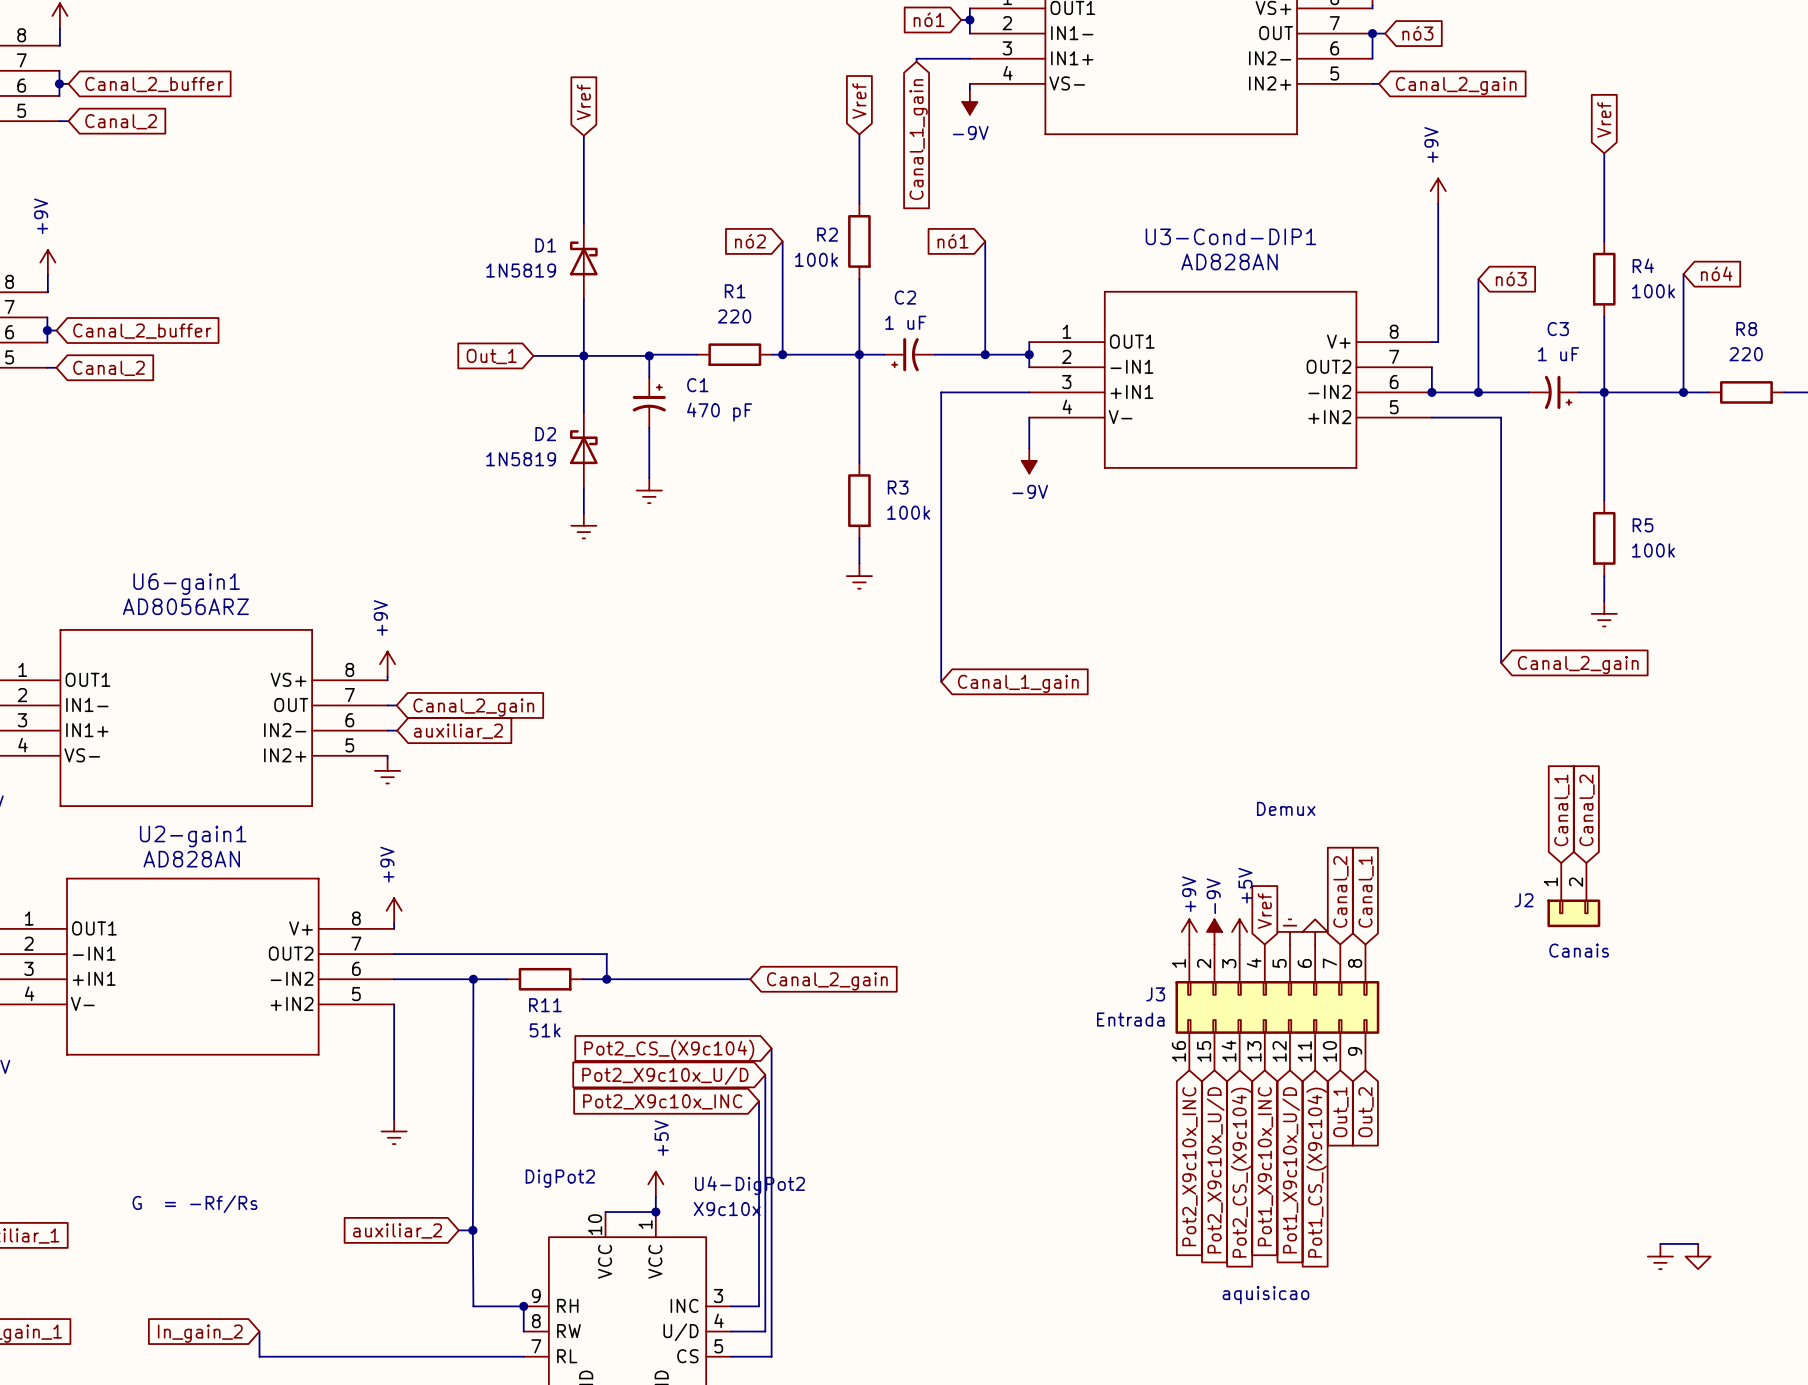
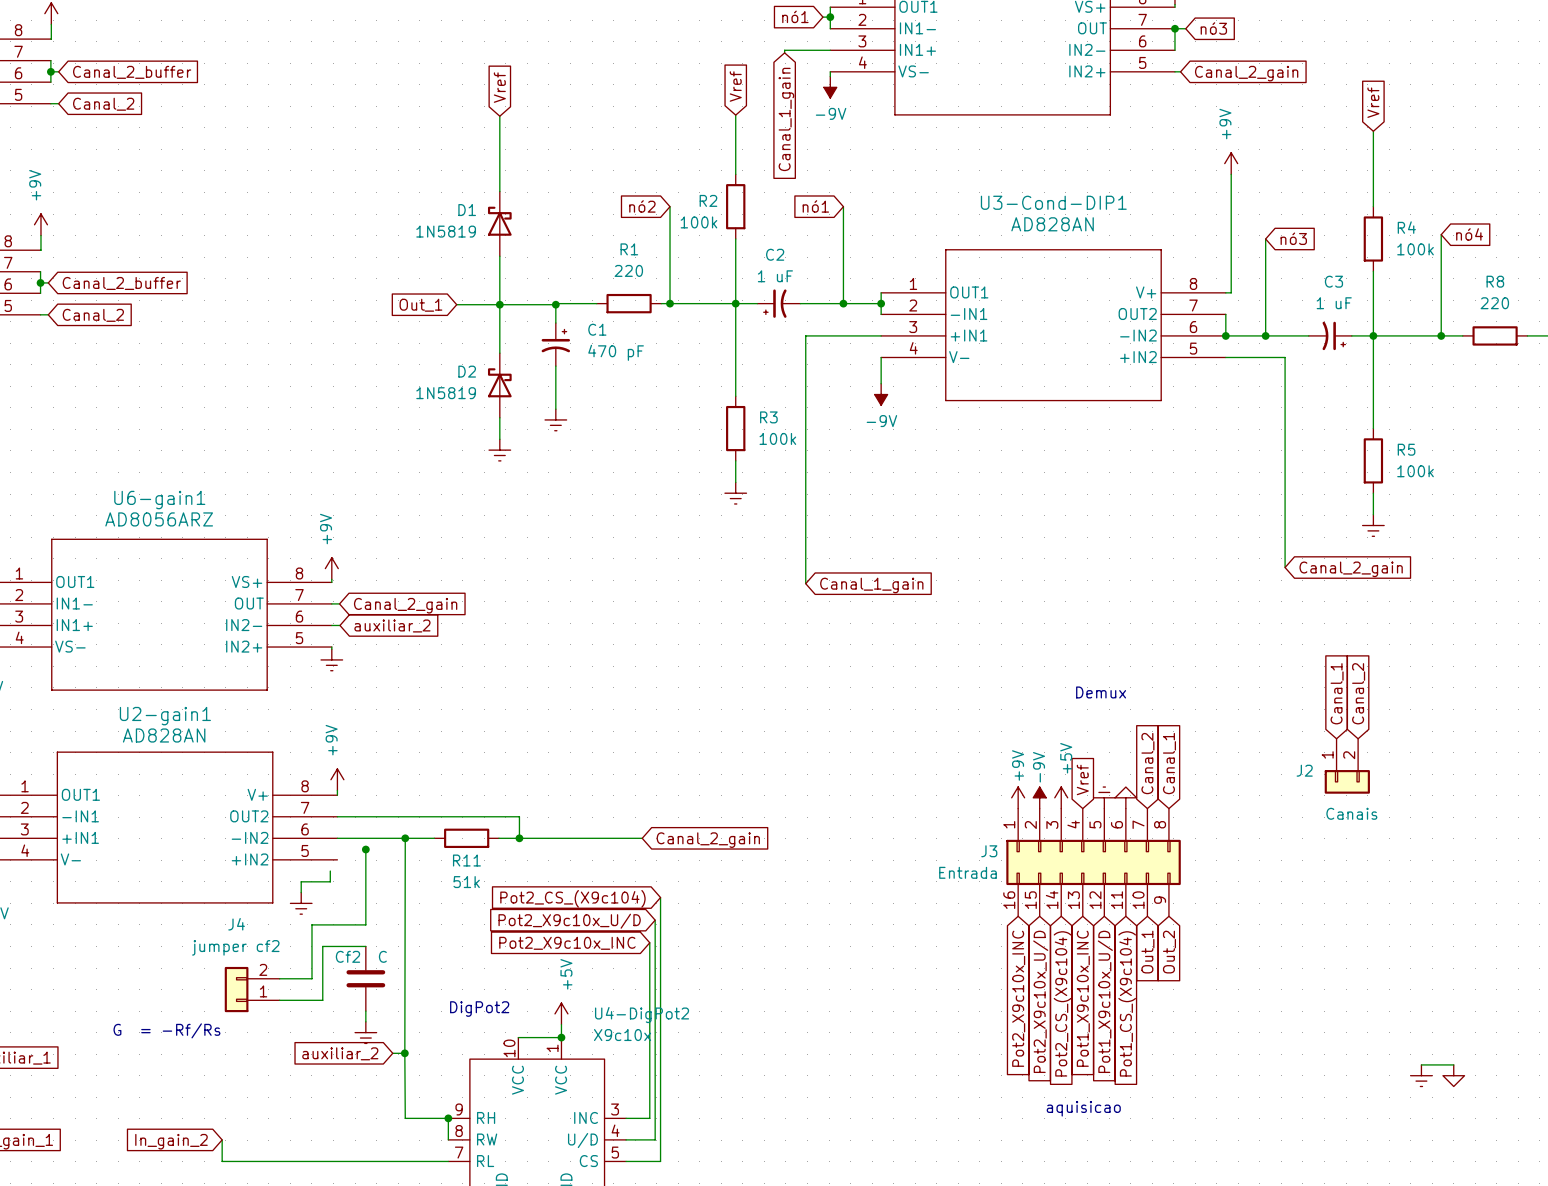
wire: none -> (365, 849) (365, 924) (311, 924) (311, 978) (279, 978)
junction: none -> (365, 849)
wire: (394, 1004) (394, 1118) -> none
wire: none -> (330, 871) (330, 881) (301, 881) (301, 892)
power symbol: none -> (301, 903)
wire: none -> (365, 946) (322, 946) (322, 1000) (279, 1000)
power symbol: (394, 1131) -> none
Cf2: none -> C (365, 978)
J4: none -> jumper cf2 (252, 989)
wire: none -> (365, 1011) (365, 1021)
power symbol: none -> (365, 1032)

